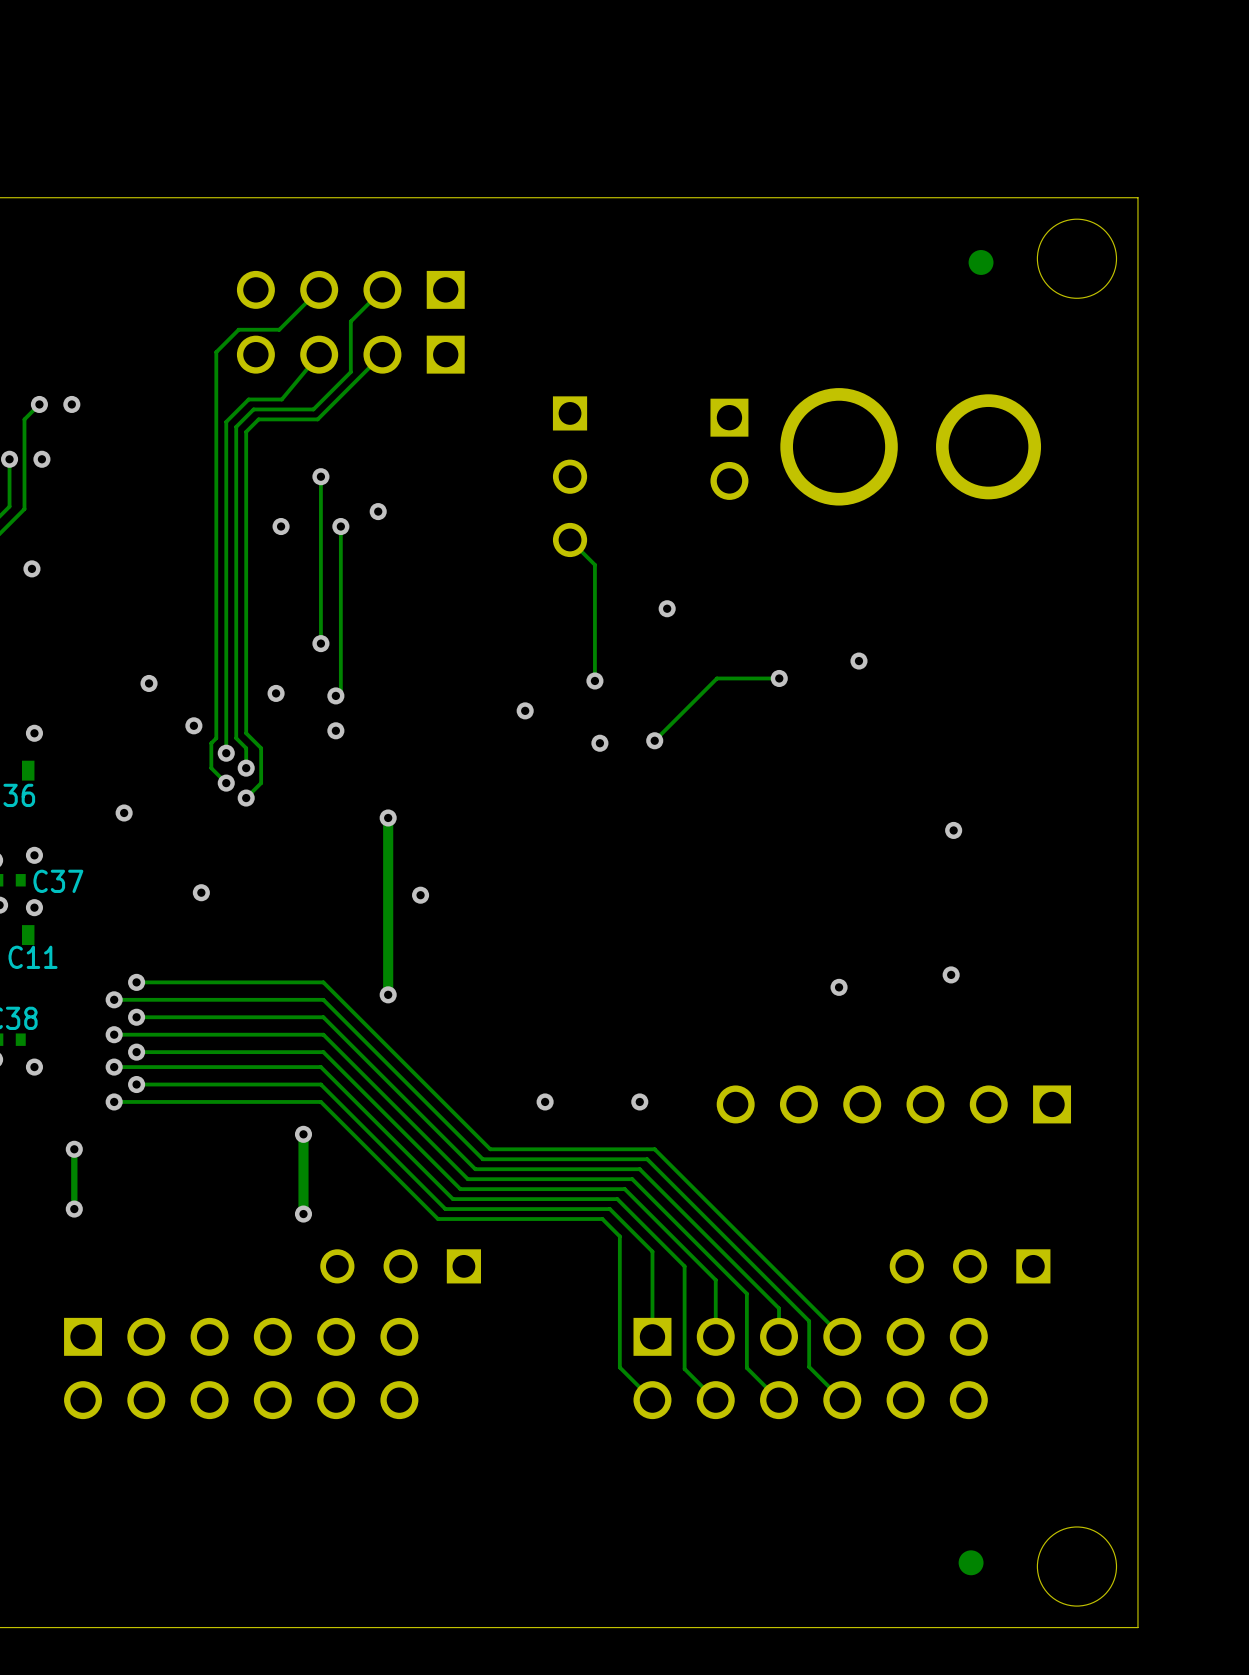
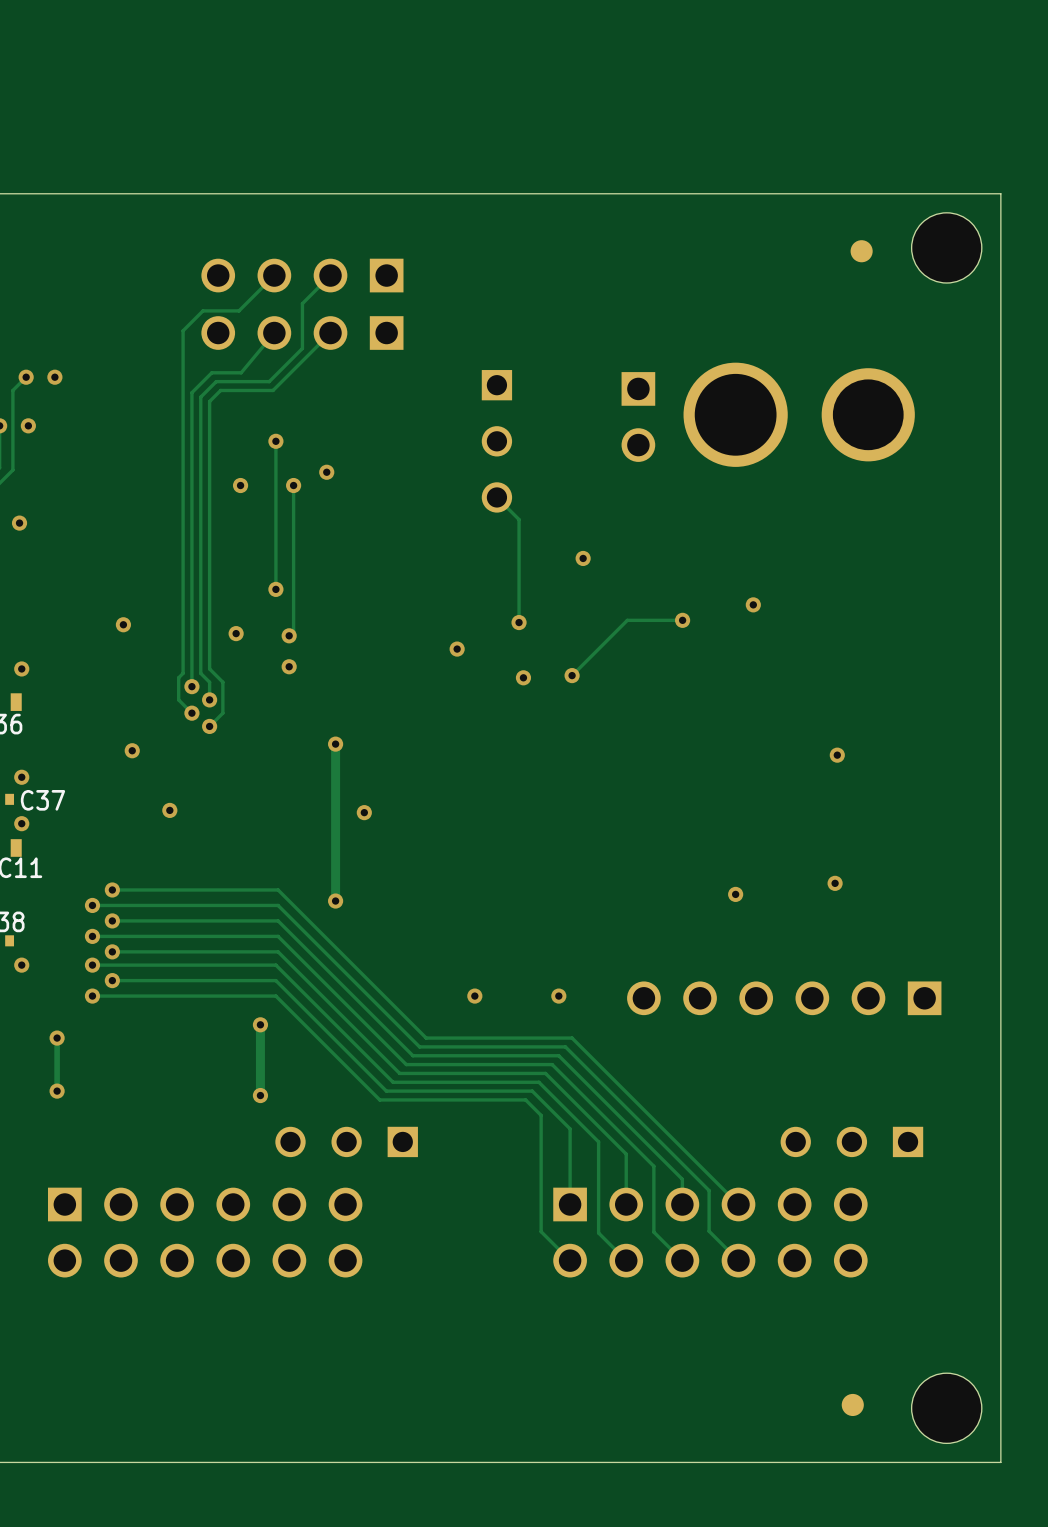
via: (193, 725) -> none
via position: (124, 812) -> (132, 750)

